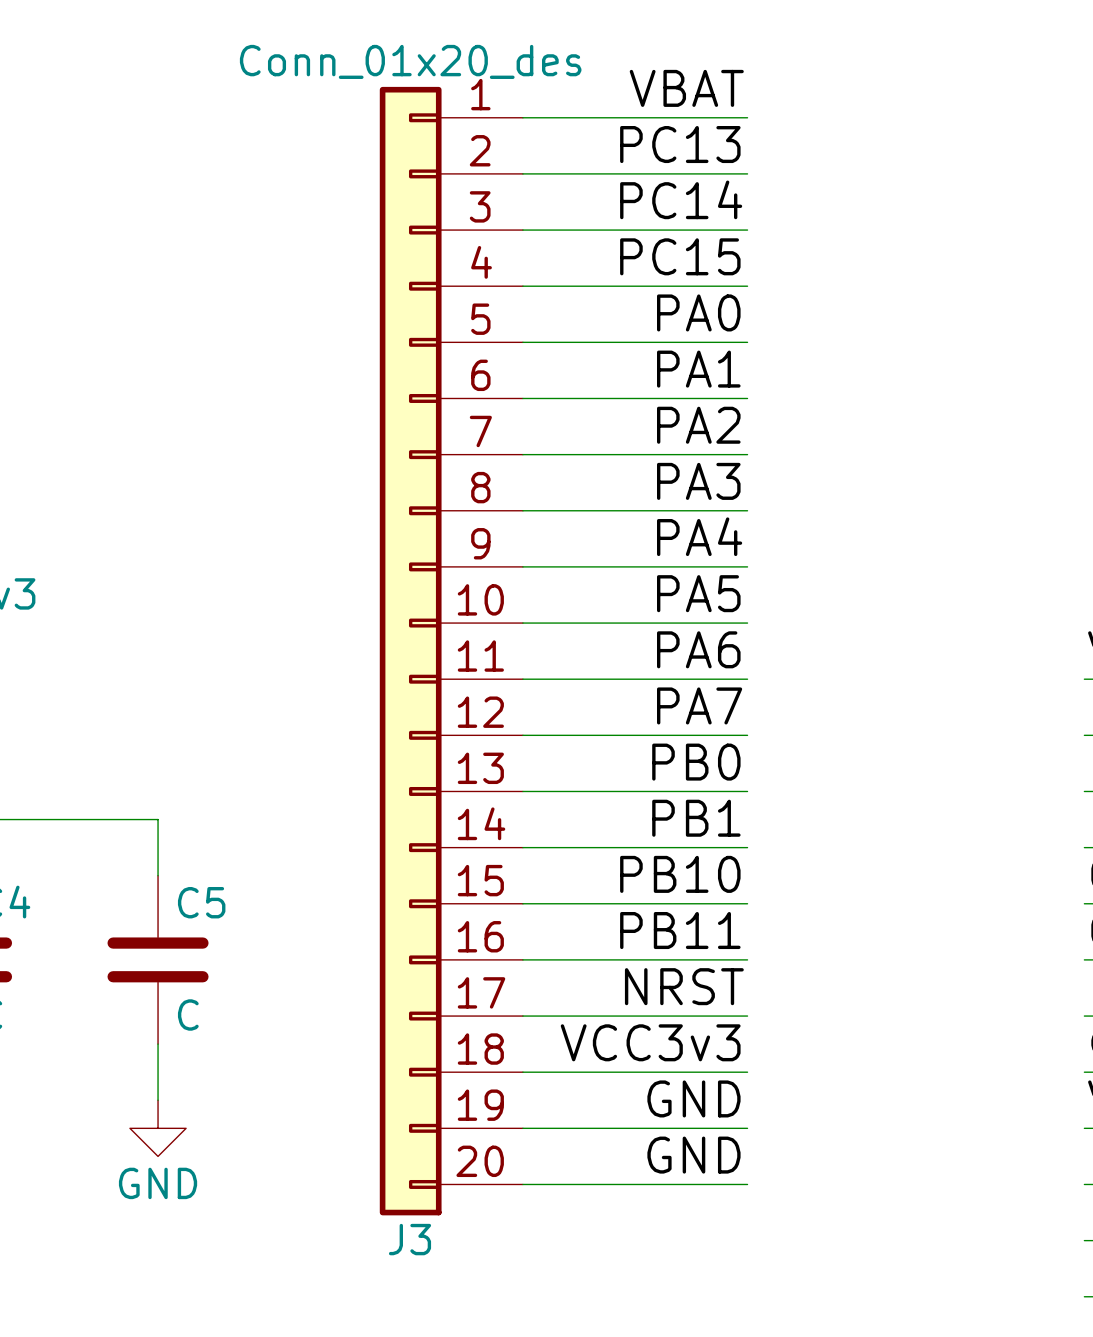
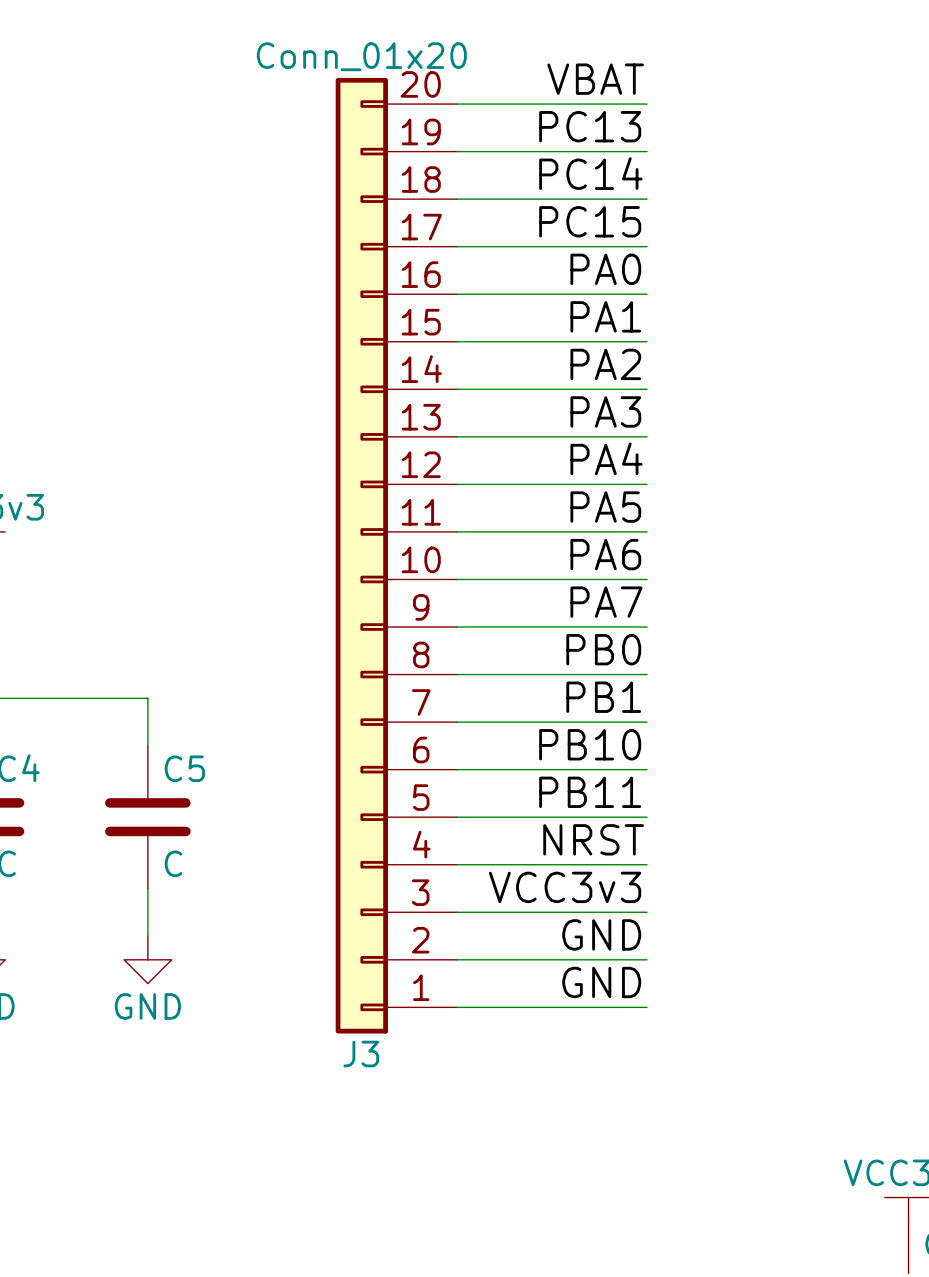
J3 value: Conn_01x20_des (410, 61) -> Conn_01x20 (361, 56)
J3 flip: as is (410, 651) -> up-down (361, 555)

